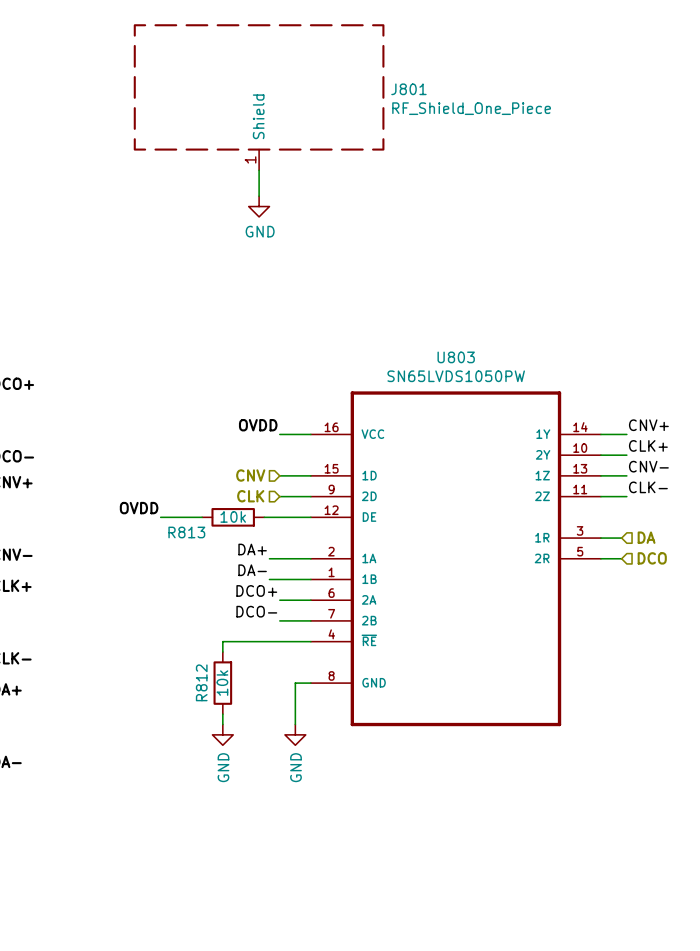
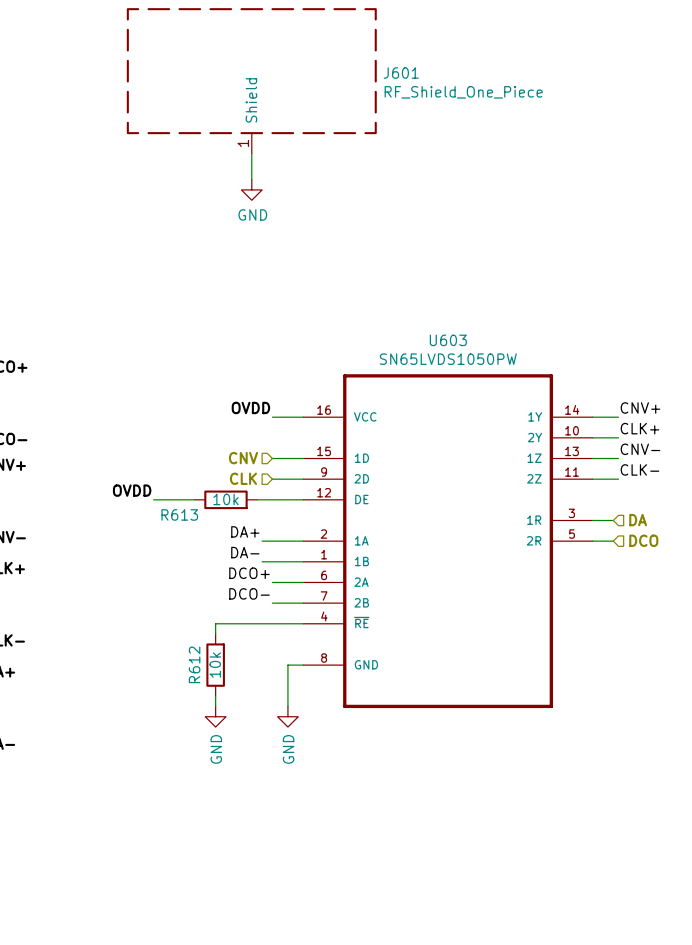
J801 name: J801 (408, 89) -> J601 (401, 73)
U803 name: U803 (456, 357) -> U603 (448, 340)
R813 name: R813 (186, 532) -> R613 (179, 514)
R812 name: R812 (201, 682) -> R612 (194, 664)

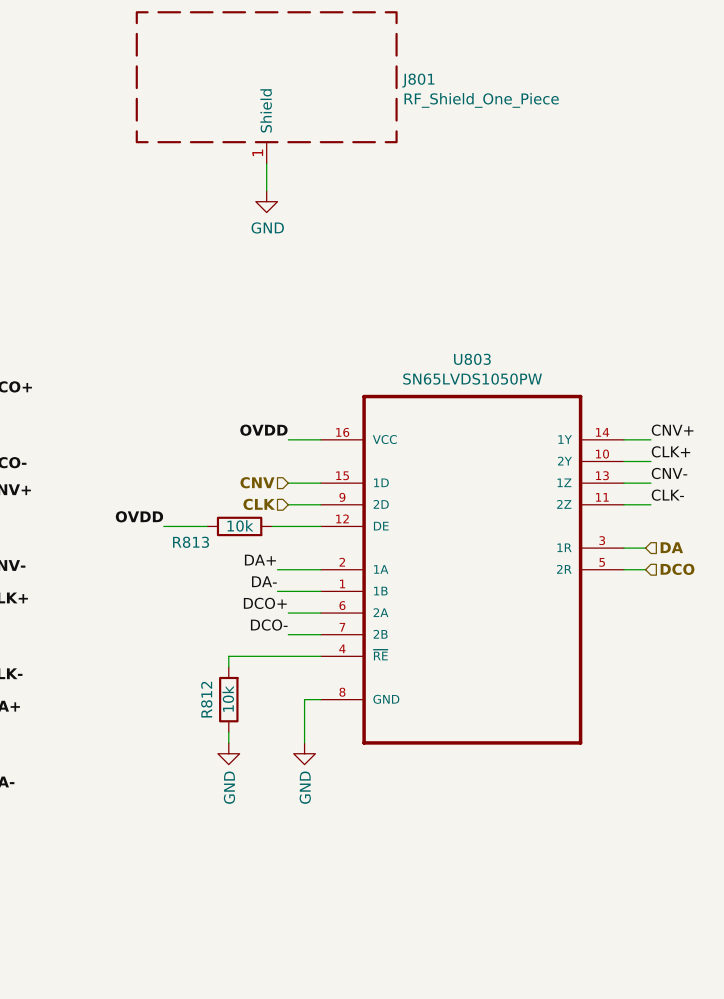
J601 name: J601 (401, 73) -> J801 (418, 80)
U603 name: U603 (448, 340) -> U803 (472, 359)
R613 name: R613 (179, 514) -> R813 (191, 542)
R612 name: R612 (194, 664) -> R812 (206, 699)

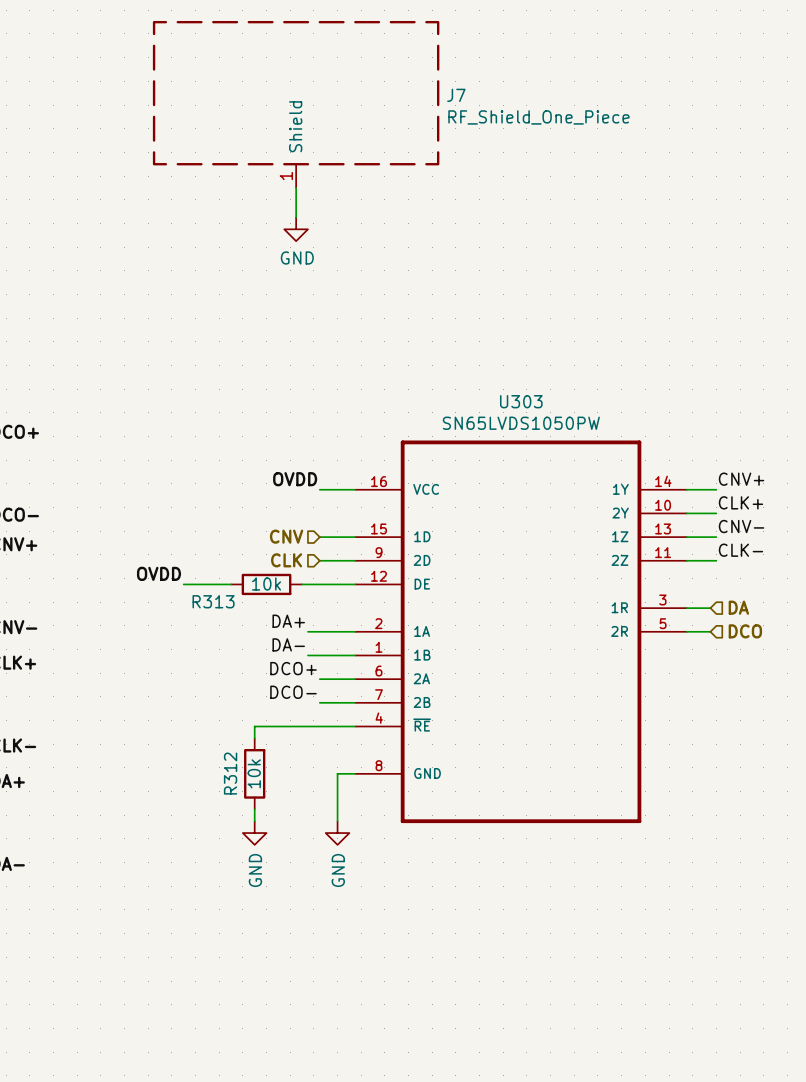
J801 name: J801 (418, 80) -> J7 (456, 95)
U803 name: U803 (472, 359) -> U303 (521, 401)
R813 name: R813 (191, 542) -> R313 (213, 601)
R812 name: R812 (206, 699) -> R312 (230, 773)

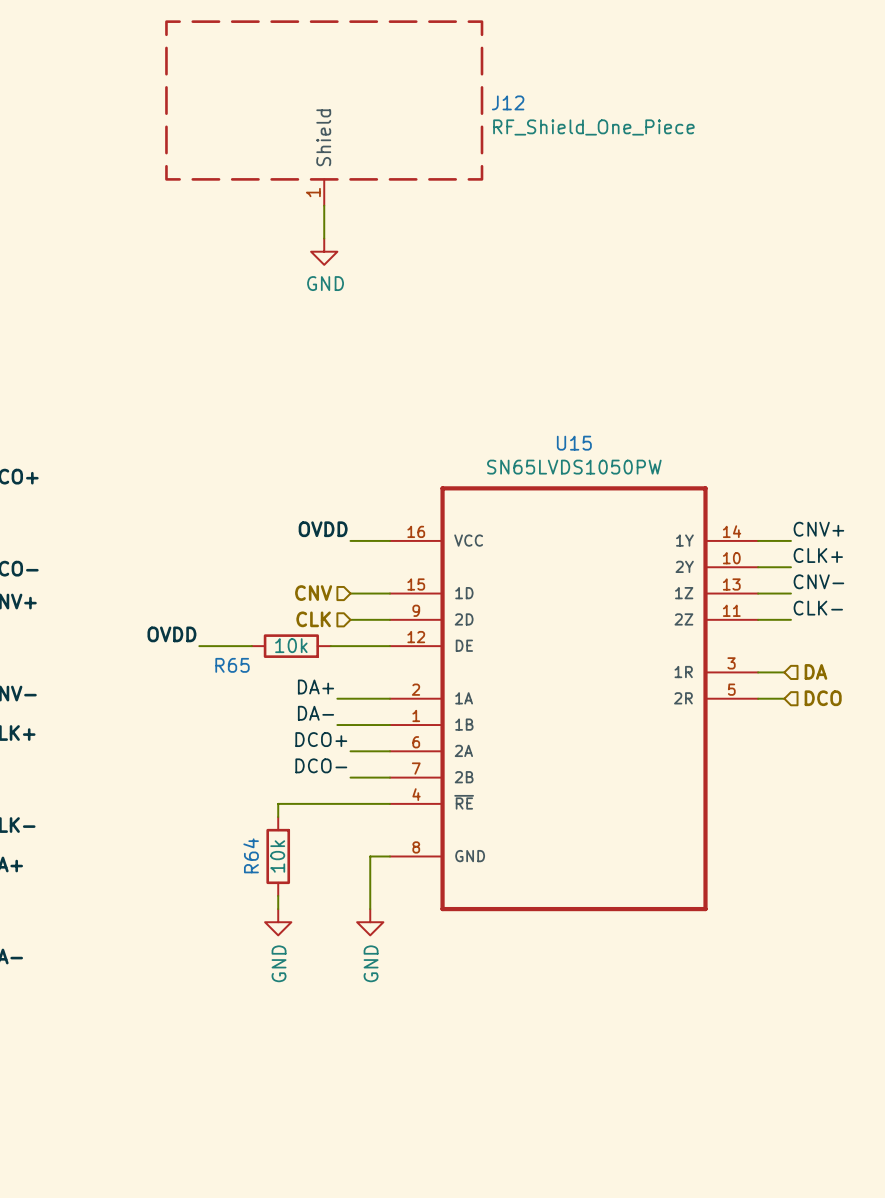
J7 name: J7 (456, 95) -> J12 (508, 102)
U303 name: U303 (521, 401) -> U15 (574, 443)
R313 name: R313 (213, 601) -> R65 (232, 665)
R312 name: R312 (230, 773) -> R64 (251, 855)

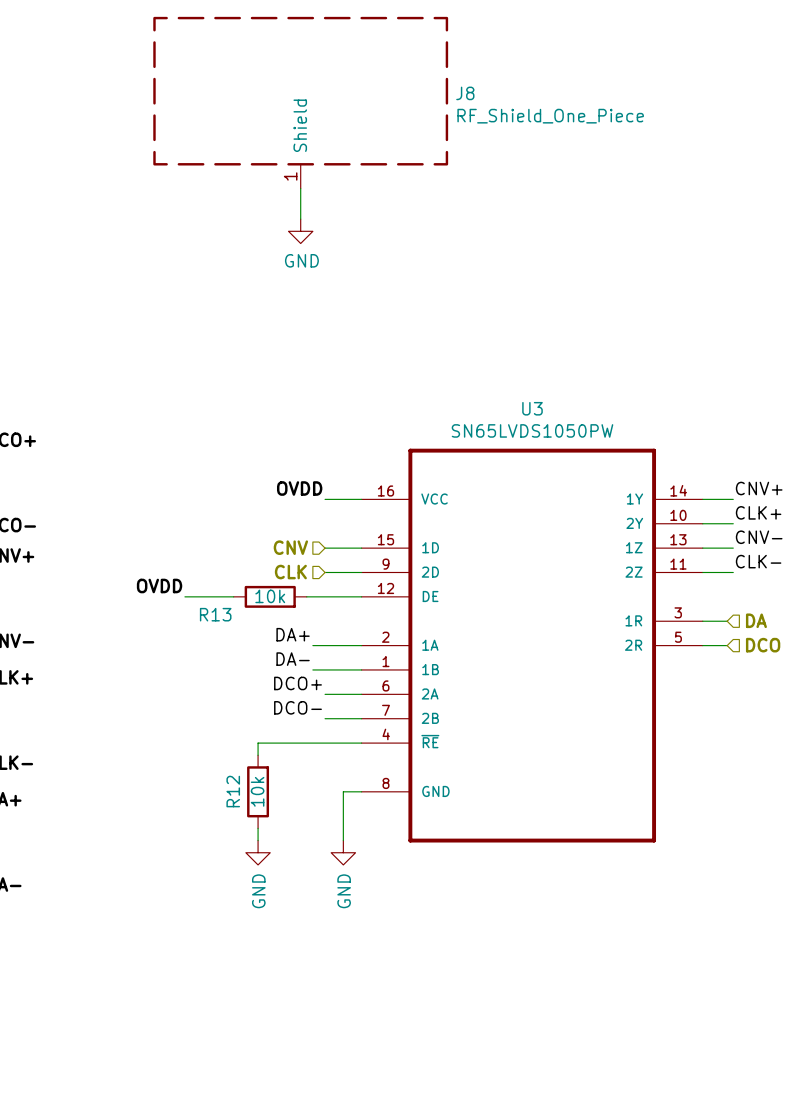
J12 name: J12 (508, 102) -> J8 (465, 93)
U15 name: U15 (574, 443) -> U3 (532, 408)
R65 name: R65 (232, 665) -> R13 (215, 614)
R64 name: R64 (251, 855) -> R12 (233, 791)

